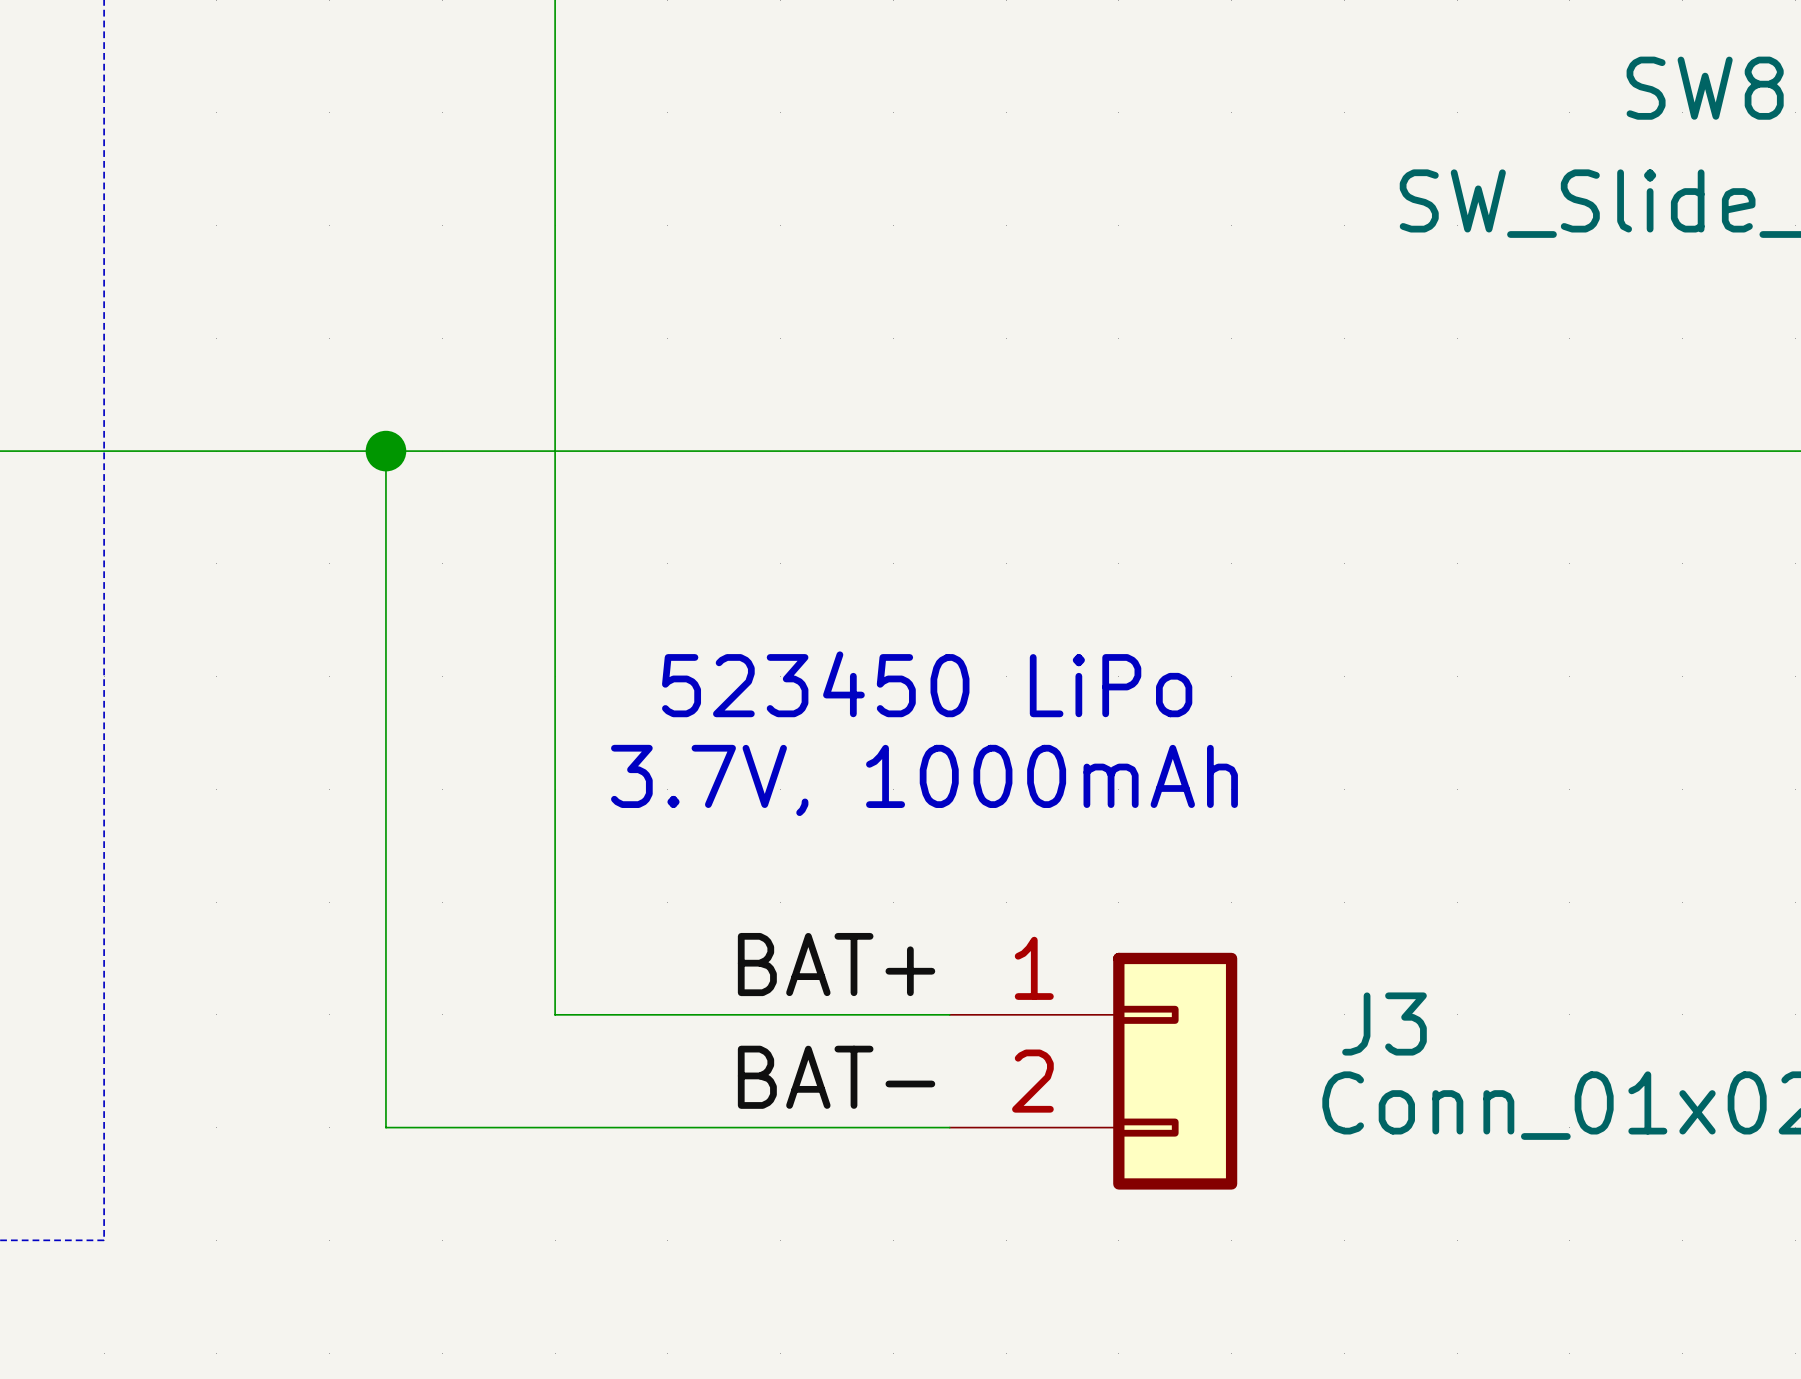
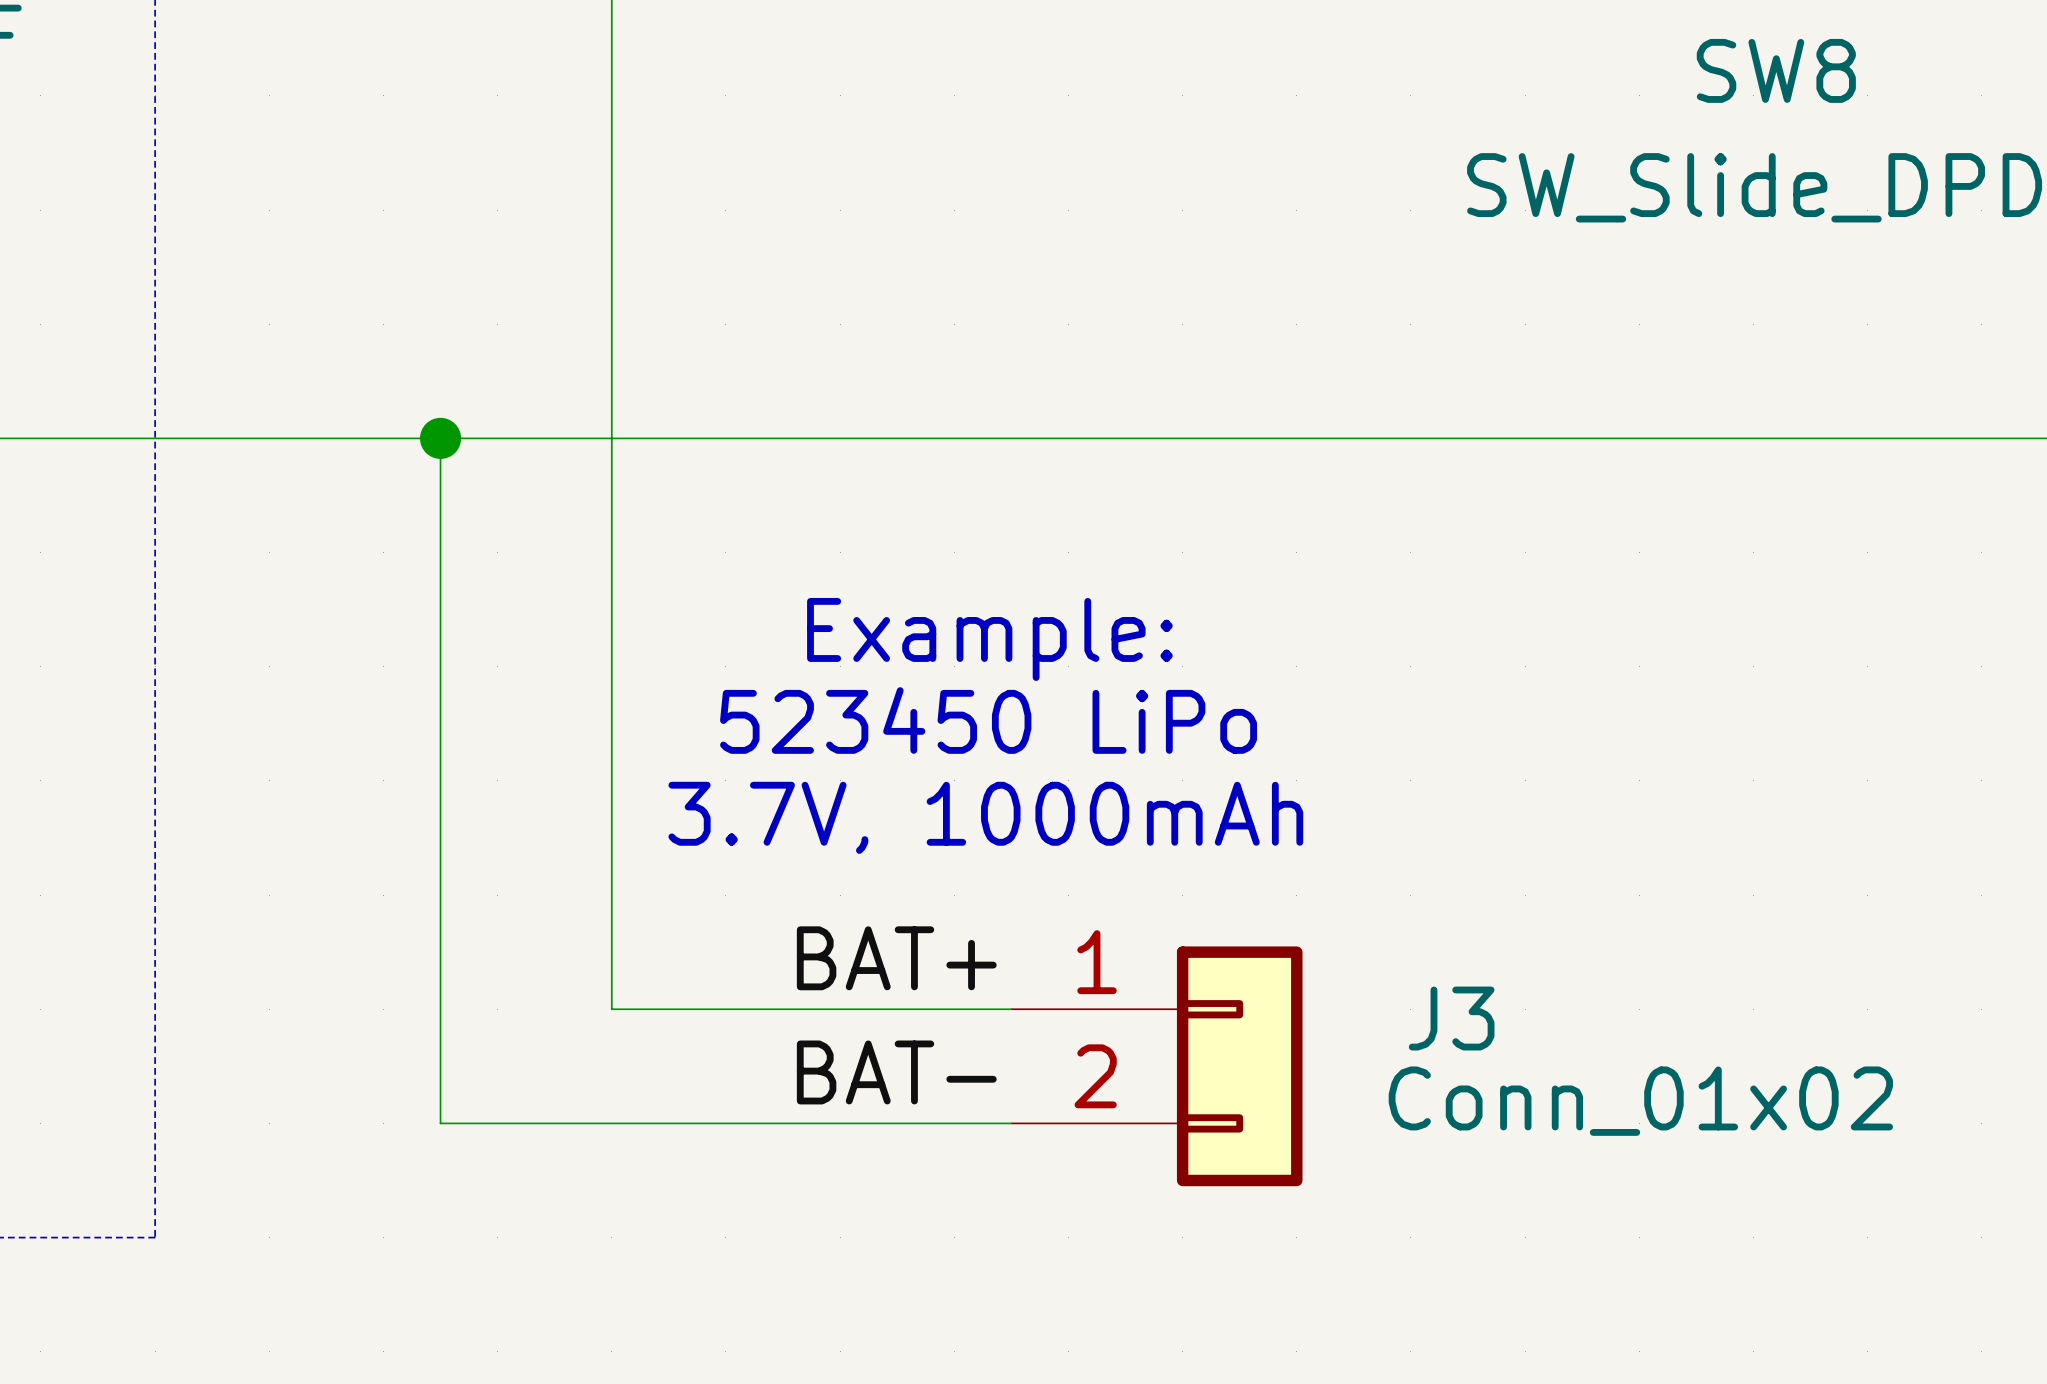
text: none -> Example: (989, 639)
text position: 523450 LiPo (927, 684) -> 523450 LiPo (988, 720)
text position: 3.7V, 1000mAh (924, 780) -> 3.7V, 1000mAh (985, 817)

